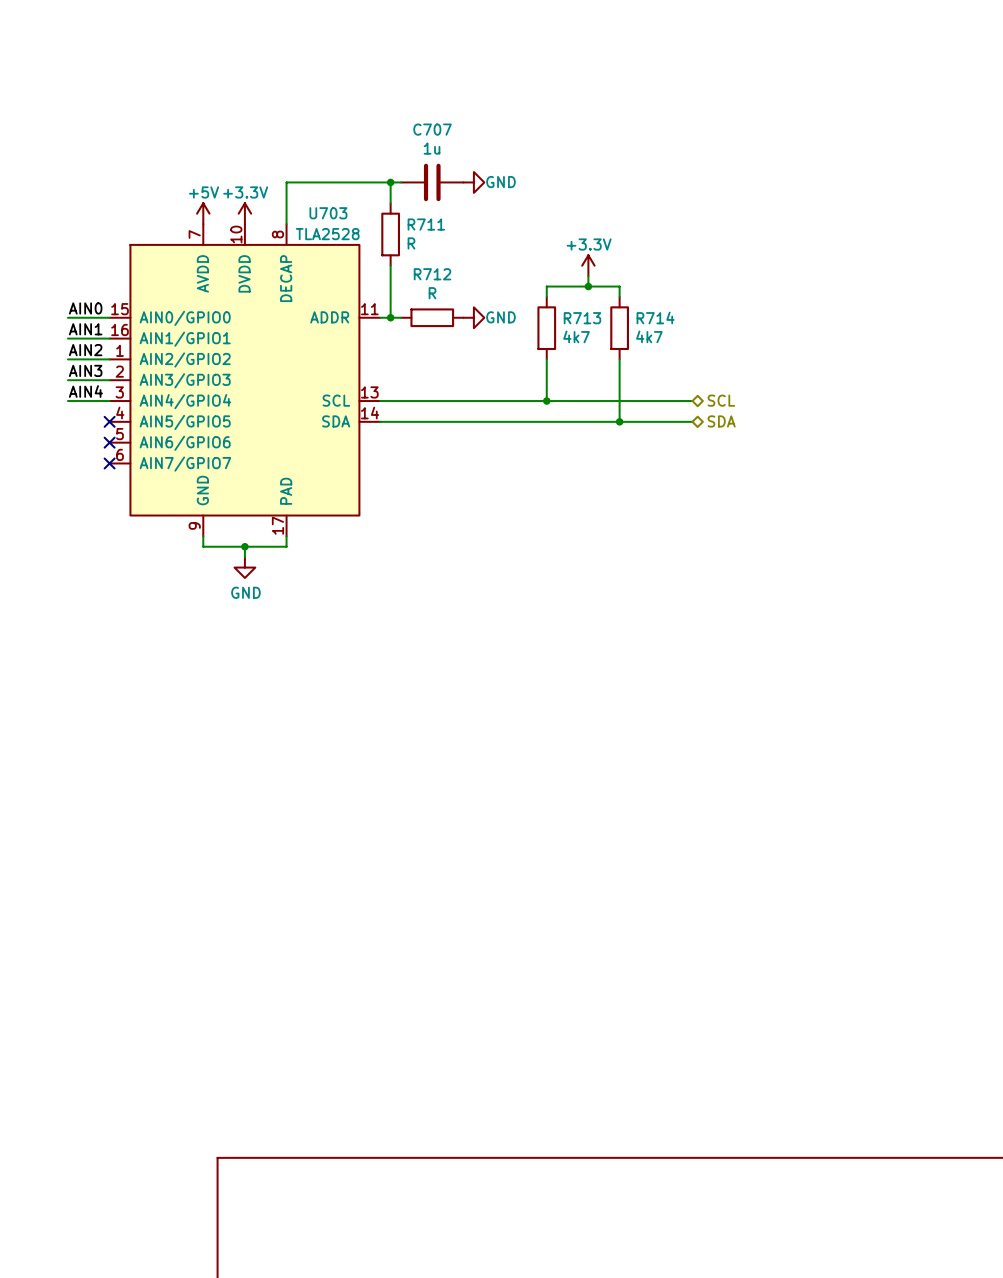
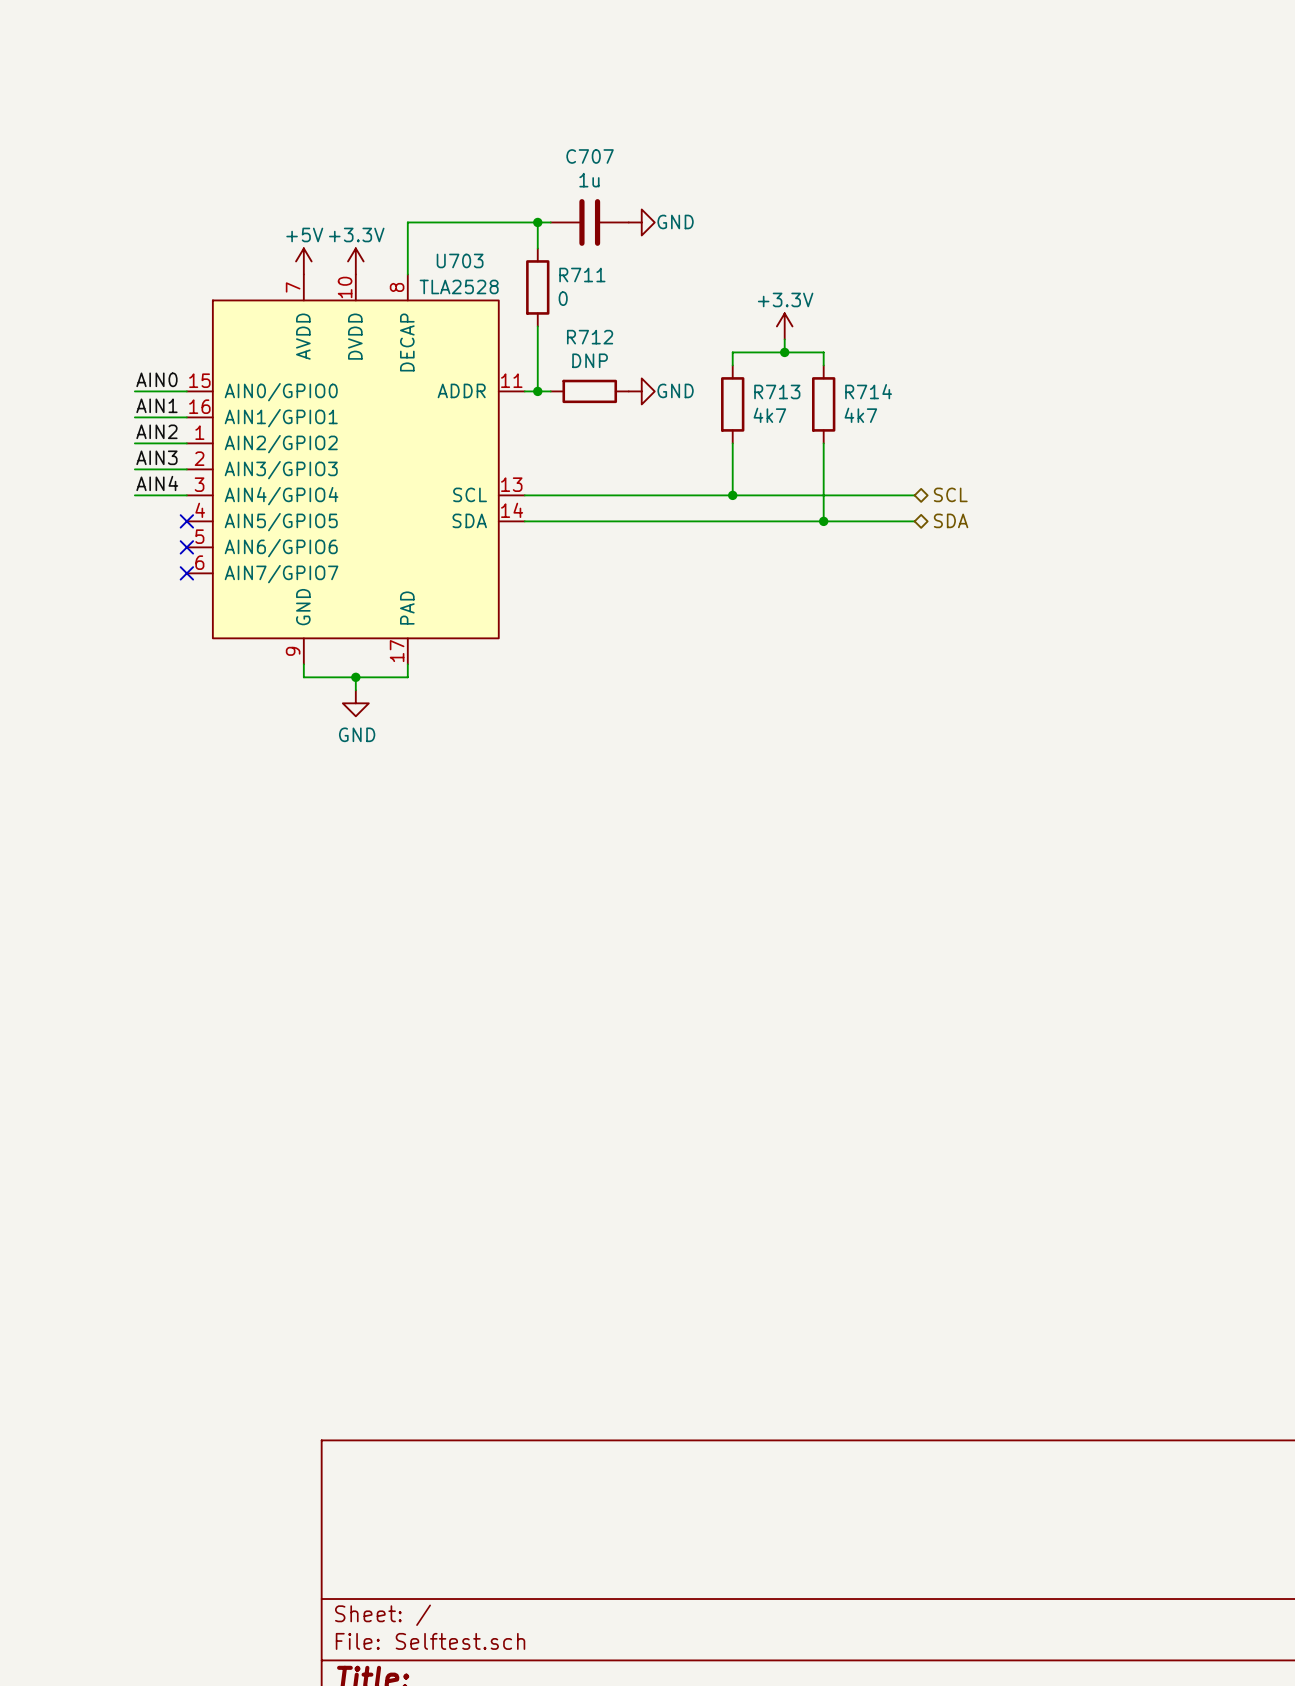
R711 value: R (411, 243) -> 0 (563, 298)
R712 value: R (432, 293) -> DNP (590, 360)

